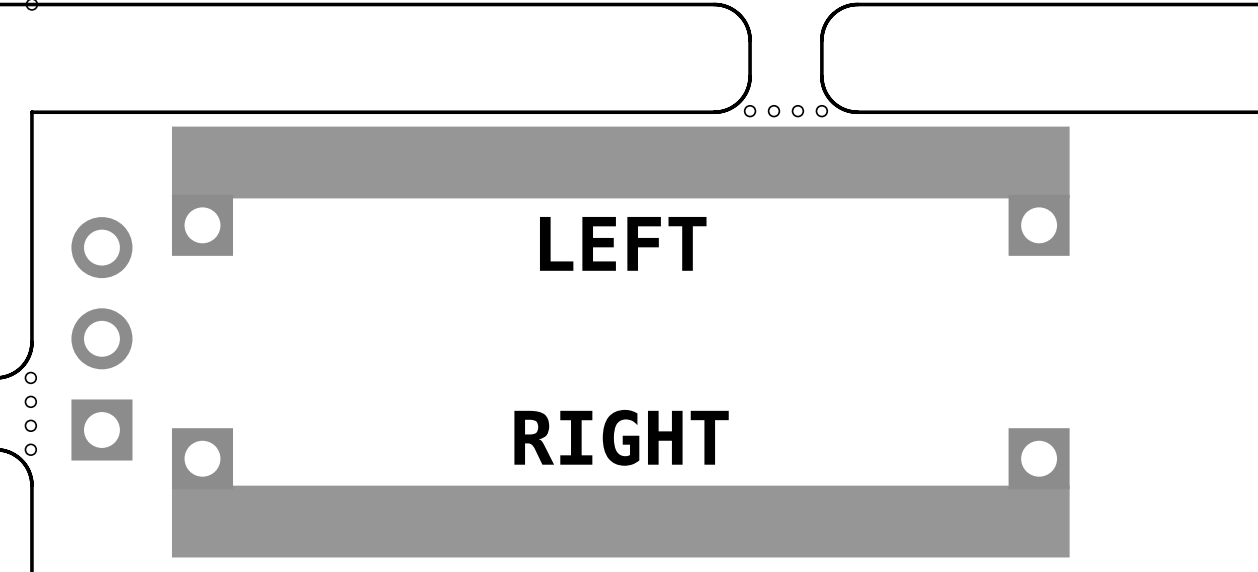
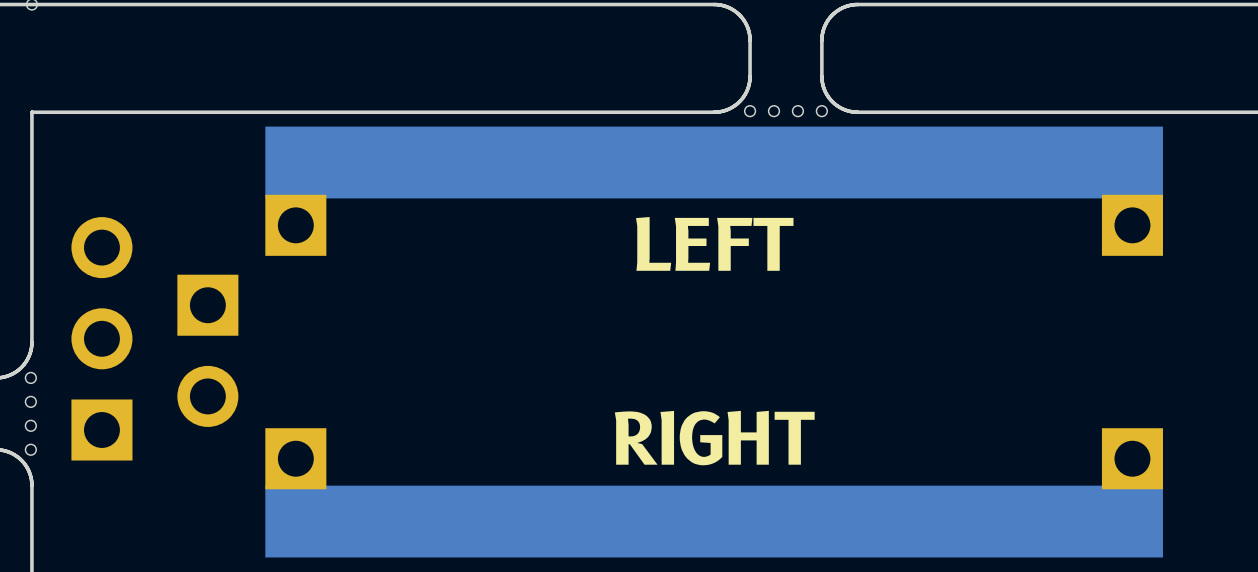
part position: (620, 342) -> (714, 342)
part: none -> (207, 350)

